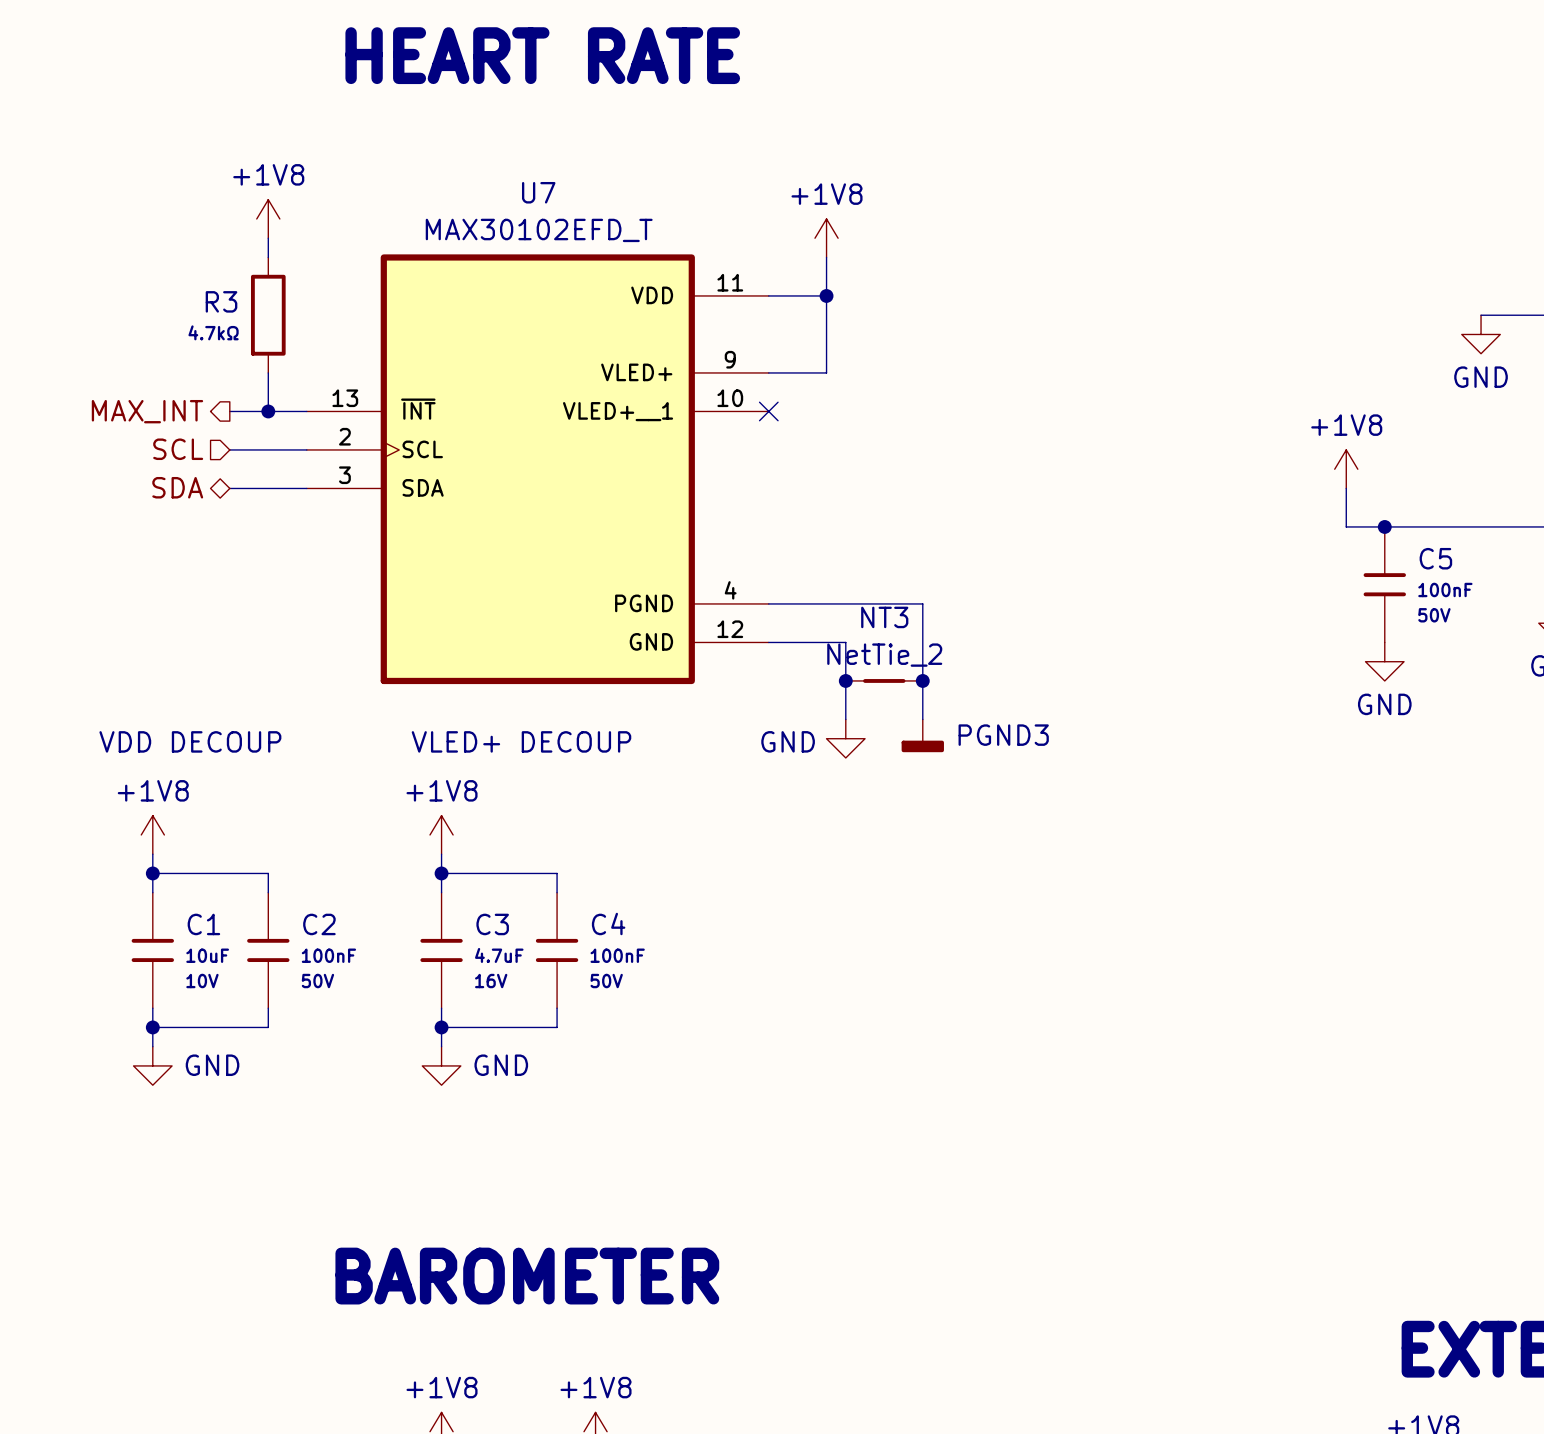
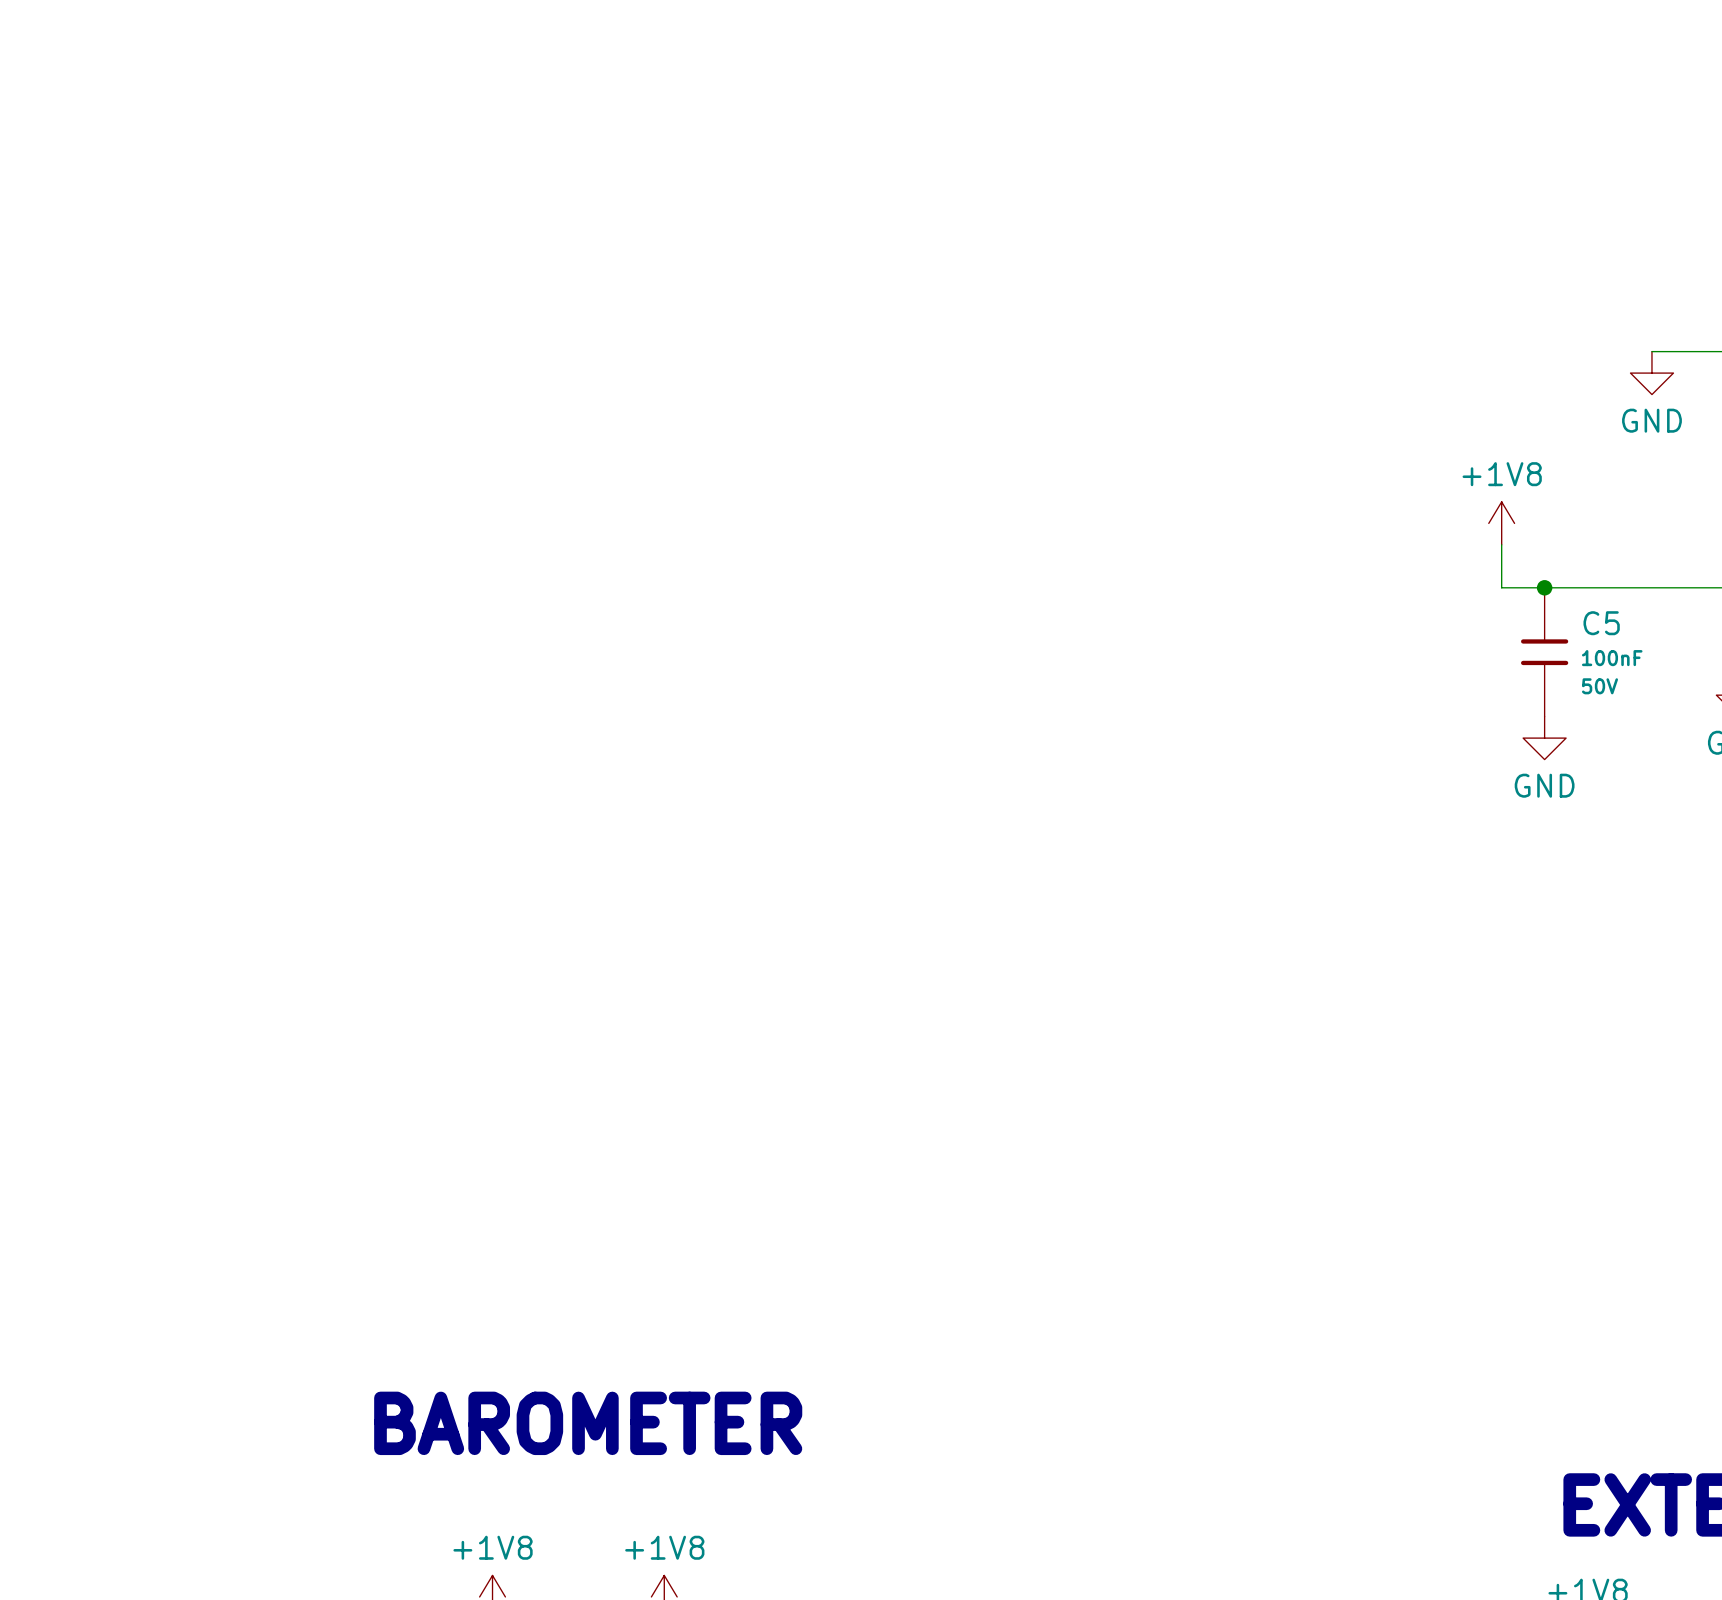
text: HEART RATE (542, 55) -> none
power symbol: +1V8 (268, 218) -> none
wire: (268, 238) (268, 257) -> none
power symbol: +1V8 (826, 238) -> none
wire: (826, 257) (826, 372) (768, 372) -> none
wire: (768, 295) (826, 295) -> none
junction: (826, 295) -> none
R3: 4.7kΩ (268, 315) -> none
wire: (268, 372) (268, 411) -> none
hierarchical label: MAX_INT (147, 411) -> none
wire: (229, 411) (306, 411) -> none
junction: (268, 411) -> none
no-connect mark: (768, 411) -> none
hierarchical label: SCL (178, 449) -> none
wire: (229, 449) (306, 449) -> none
U7: MAX30102EFD_T (537, 469) -> none
hierarchical label: SDA (177, 487) -> none
wire: (229, 488) (306, 488) -> none
wire: (768, 603) (922, 603) (922, 719) -> none
wire: (768, 642) (845, 642) (845, 719) -> none
junction: (845, 680) -> none
NT3: NetTie_2 (884, 680) -> none
junction: (922, 680) -> none
power symbol: PGND3 (922, 735) -> none
power symbol: GND (845, 738) -> none
text: VDD DECOUP (190, 741) -> none
text: VLED+ DECOUP (521, 741) -> none
power symbol: +1V8 (152, 834) -> none
power symbol: +1V8 (441, 834) -> none
wire: (152, 854) (152, 892) -> none
wire: (441, 854) (441, 892) -> none
wire: (152, 873) (268, 873) (268, 892) -> none
junction: (152, 873) -> none
wire: (441, 873) (557, 873) (557, 892) -> none
junction: (441, 873) -> none
C1: 10uF (152, 950) -> none
C2: 100nF (268, 950) -> none
C3: 4.7uF (441, 950) -> none
C4: 100nF (557, 950) -> none
wire: (152, 1008) (152, 1046) -> none
wire: (268, 1008) (268, 1027) (152, 1027) -> none
wire: (441, 1008) (441, 1046) -> none
wire: (557, 1008) (557, 1027) (441, 1027) -> none
junction: (152, 1027) -> none
junction: (441, 1027) -> none
power symbol: GND (152, 1065) -> none
power symbol: GND (441, 1065) -> none

